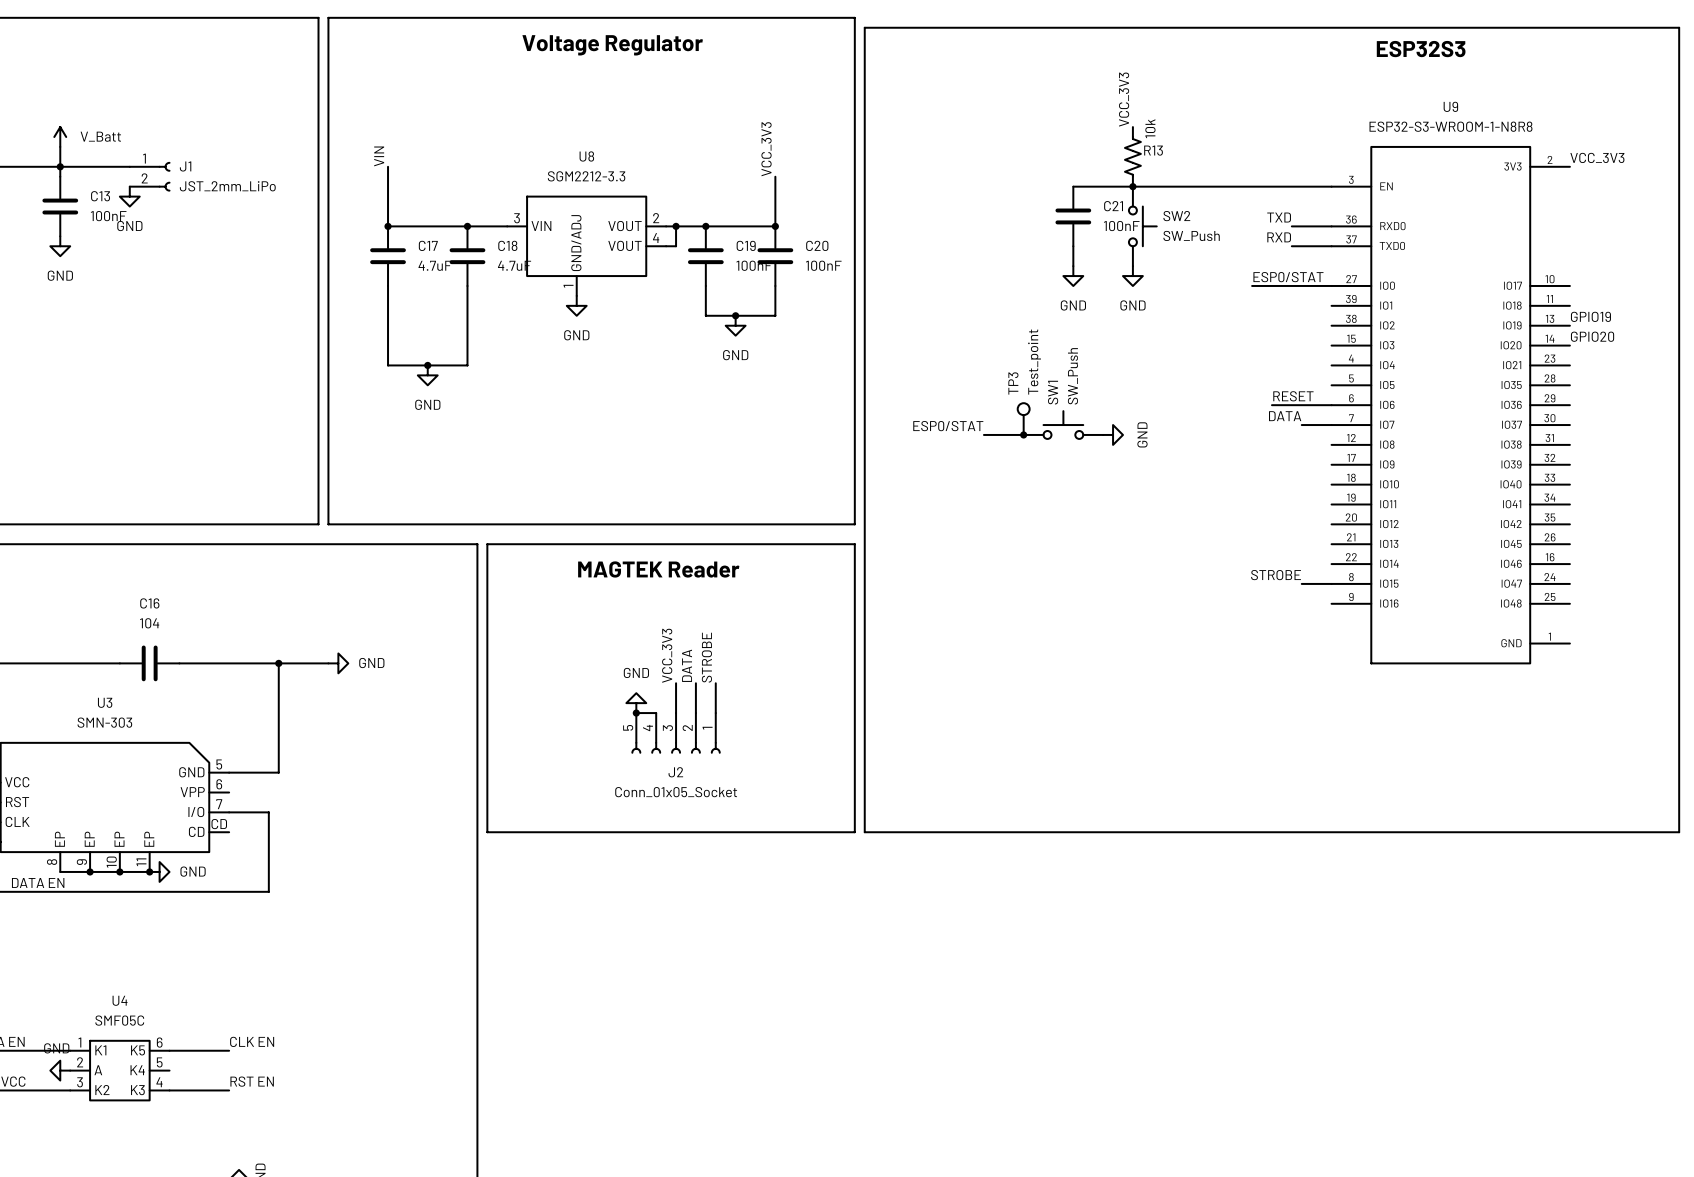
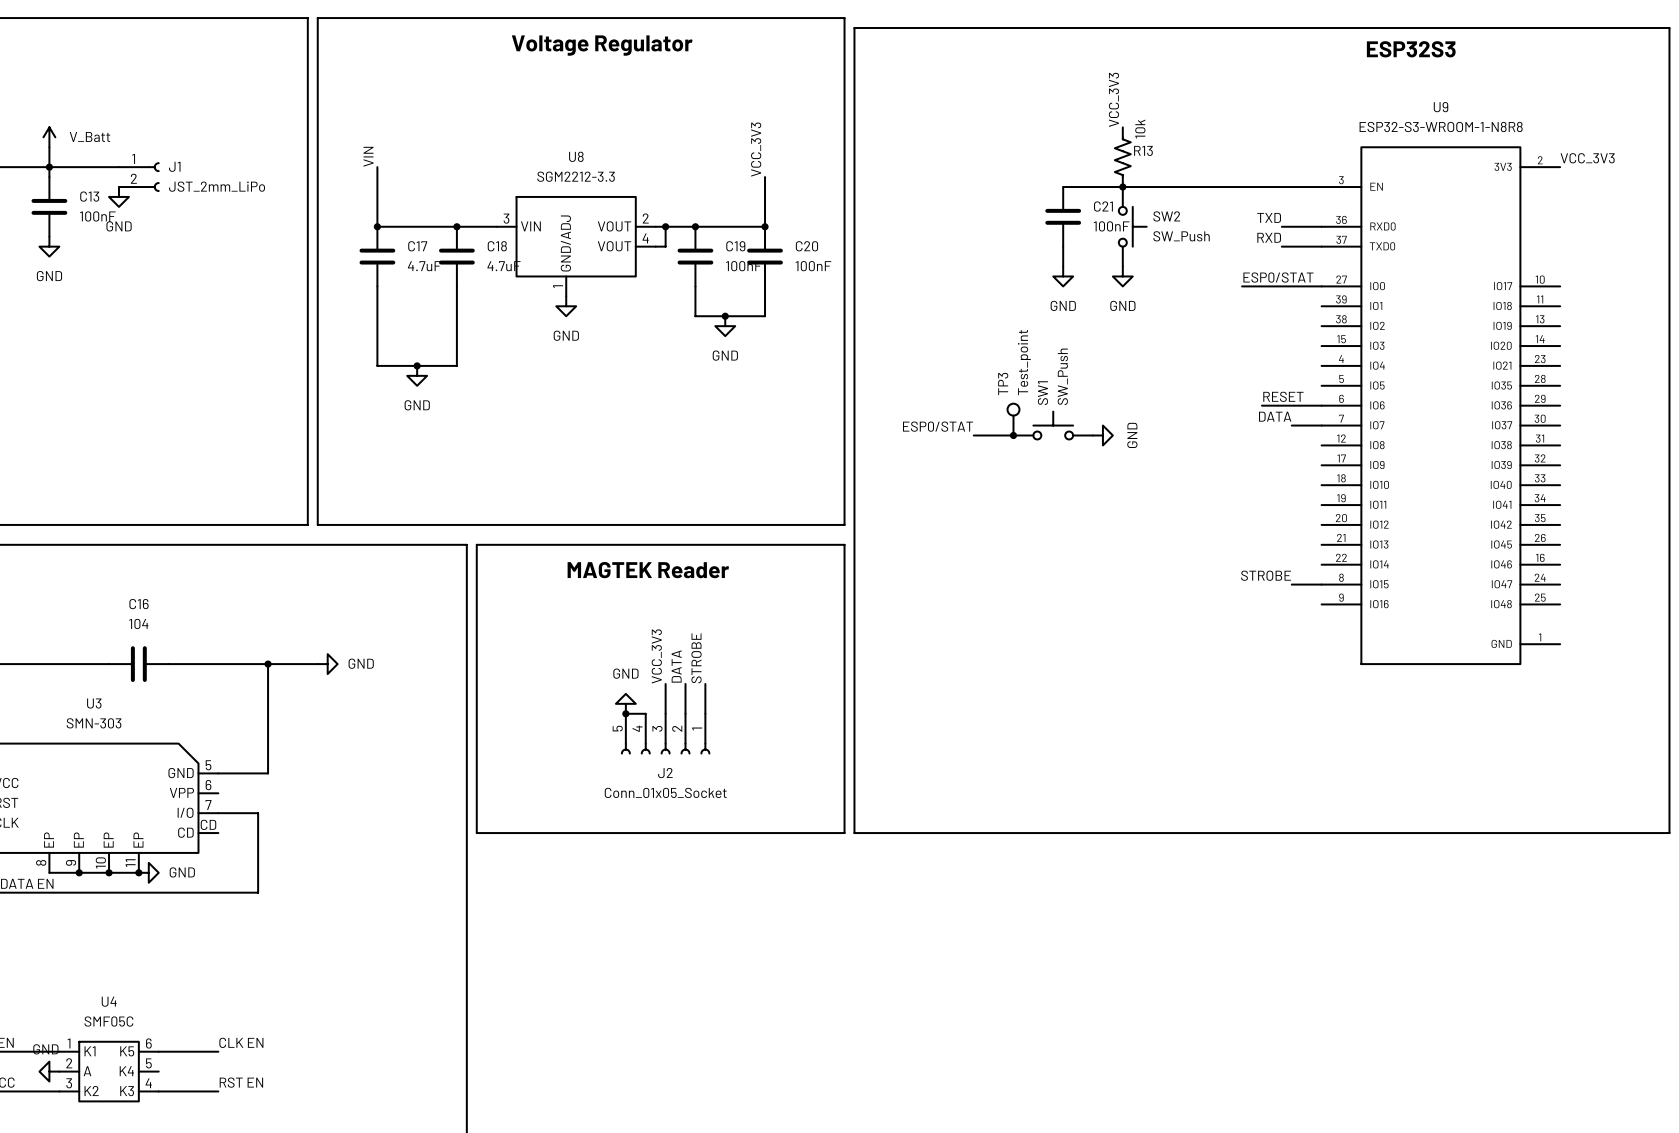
label: GPIO19 (1590, 316) -> none
label: GPIO20 (1592, 336) -> none

